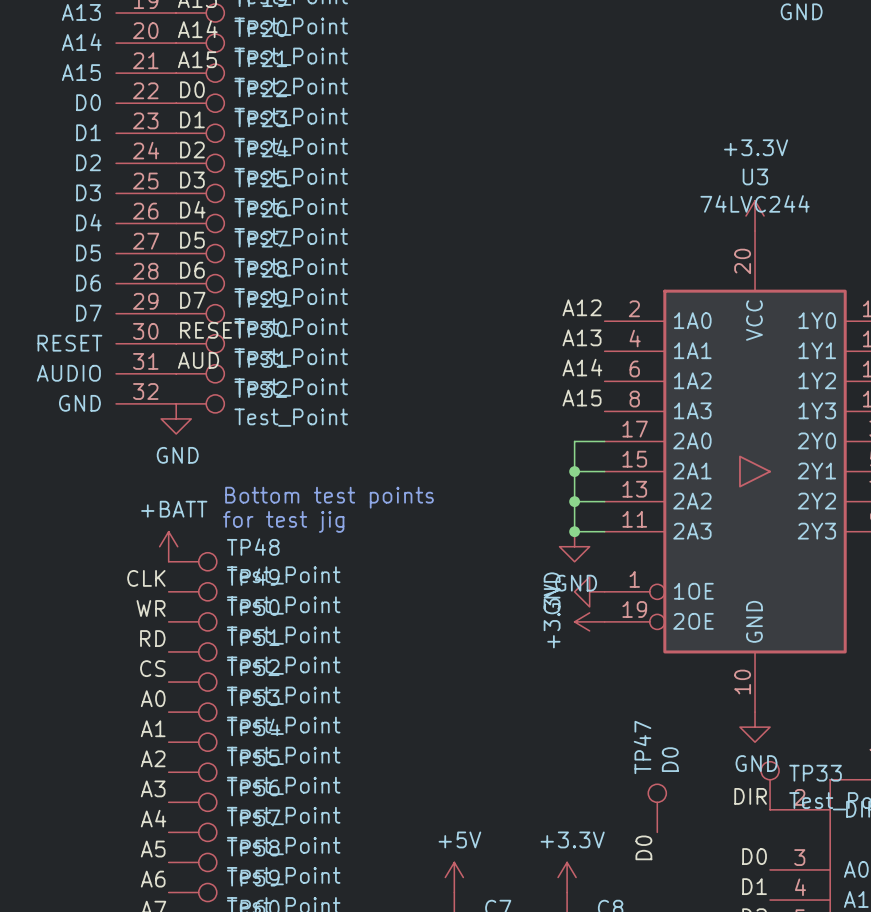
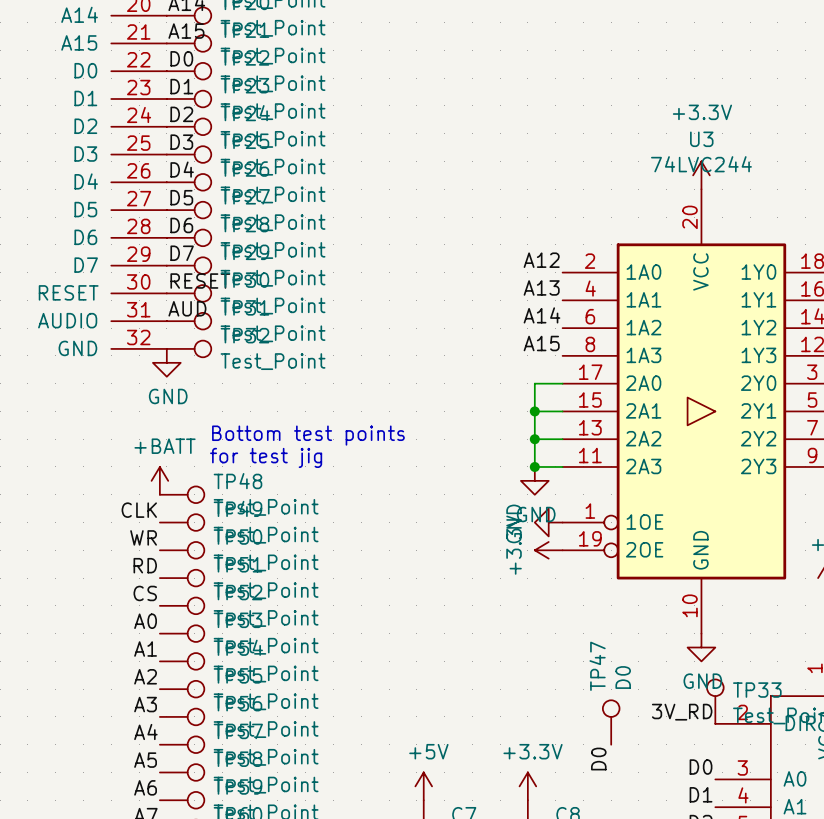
label: DIR (750, 796) -> 3V_RD (682, 712)

